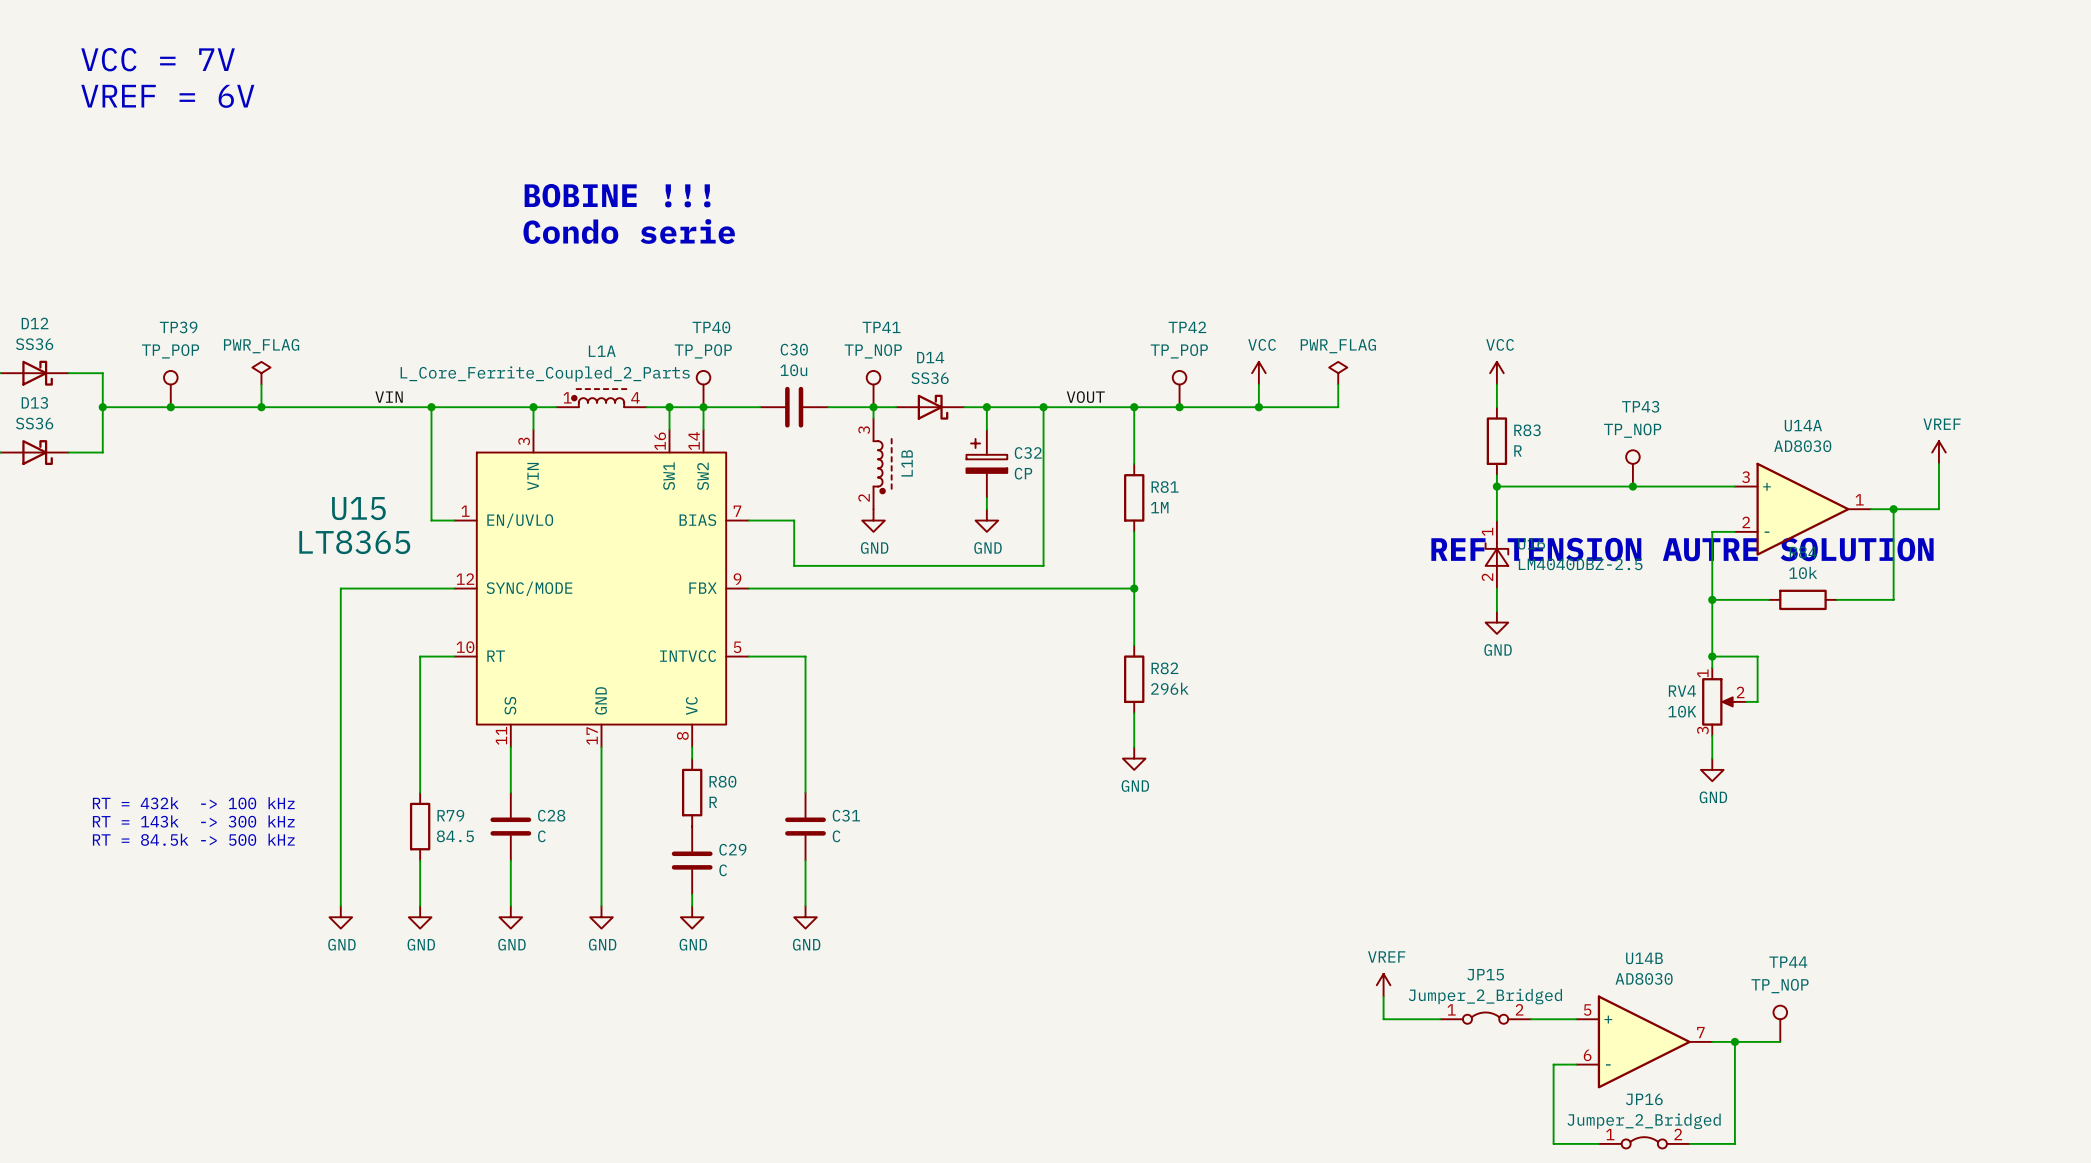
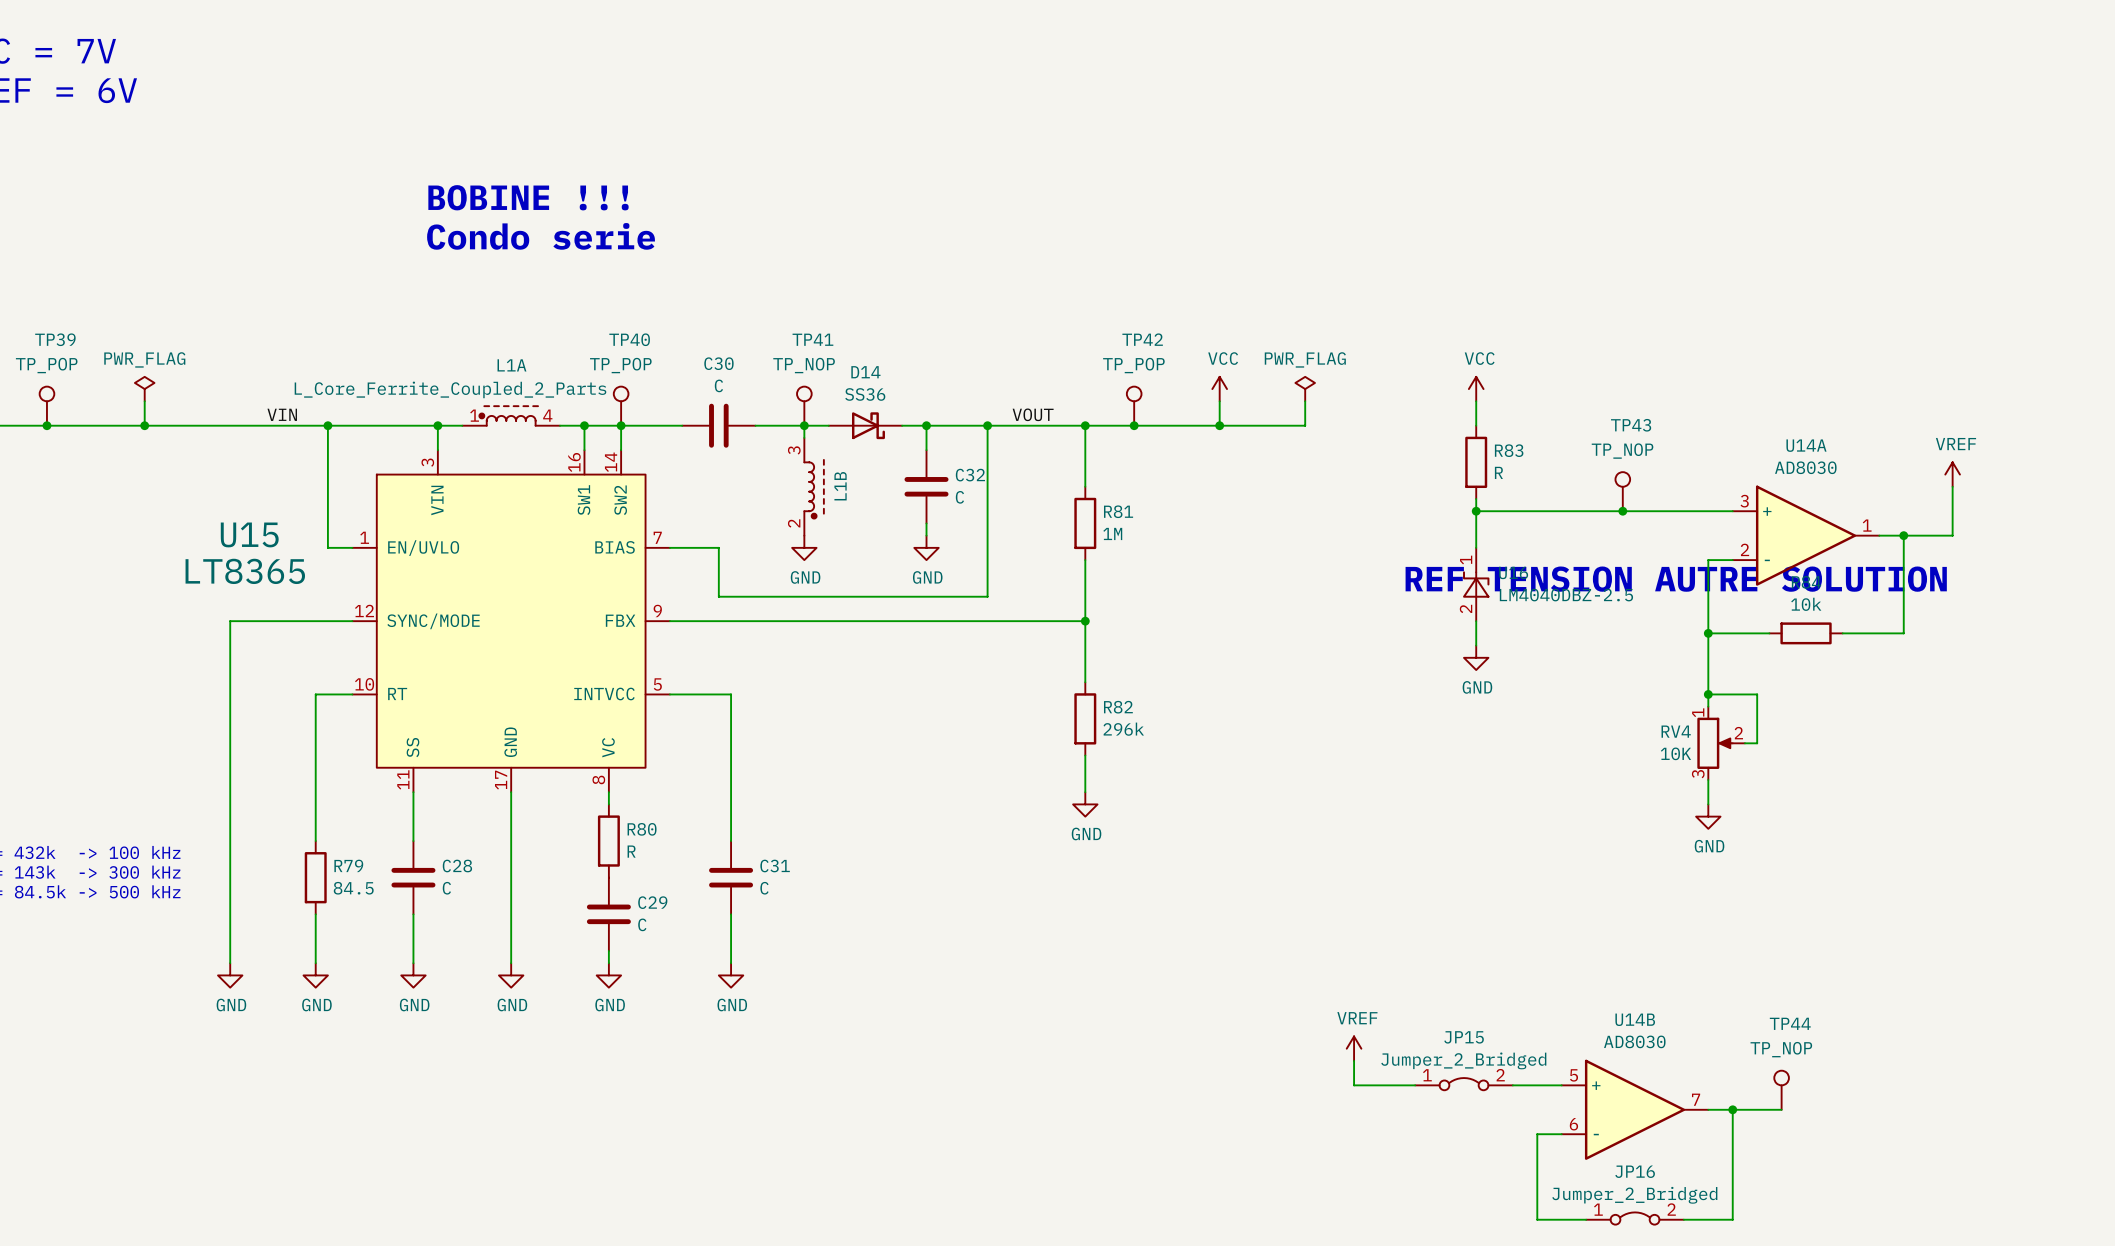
C30 value: 10u (793, 370) -> C (718, 385)
C32 symbol: [966, 429, 1008, 498] -> [904, 450, 949, 524]
C32 value: CP (1023, 473) -> C (959, 497)

